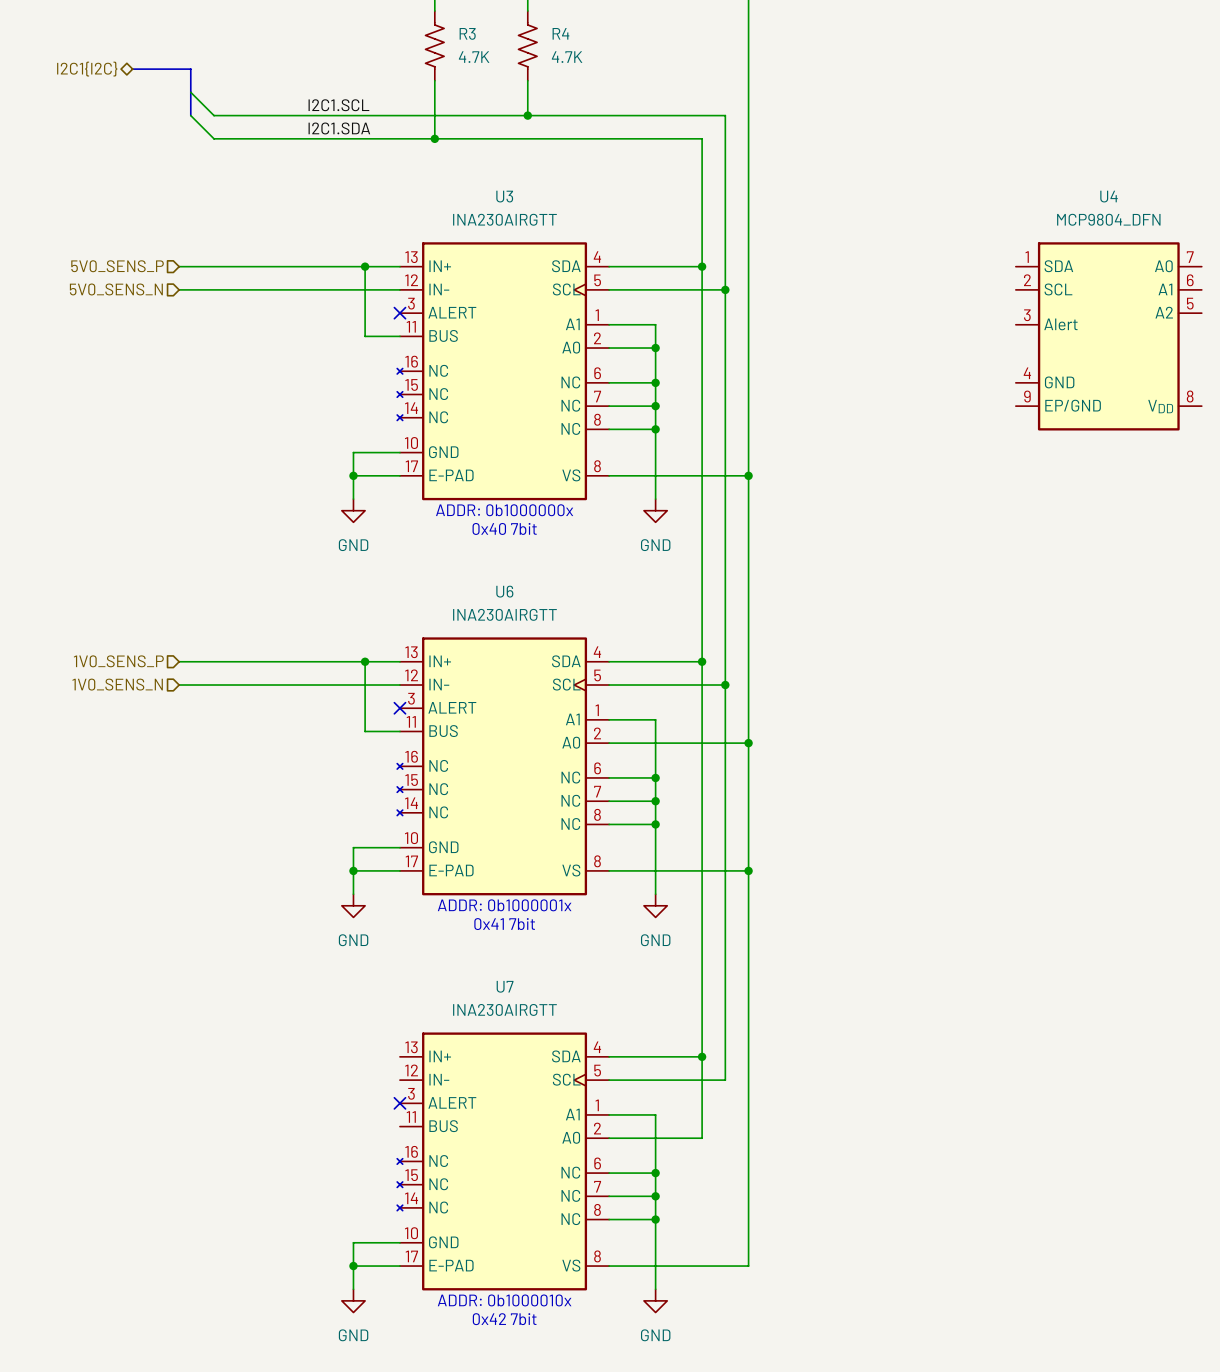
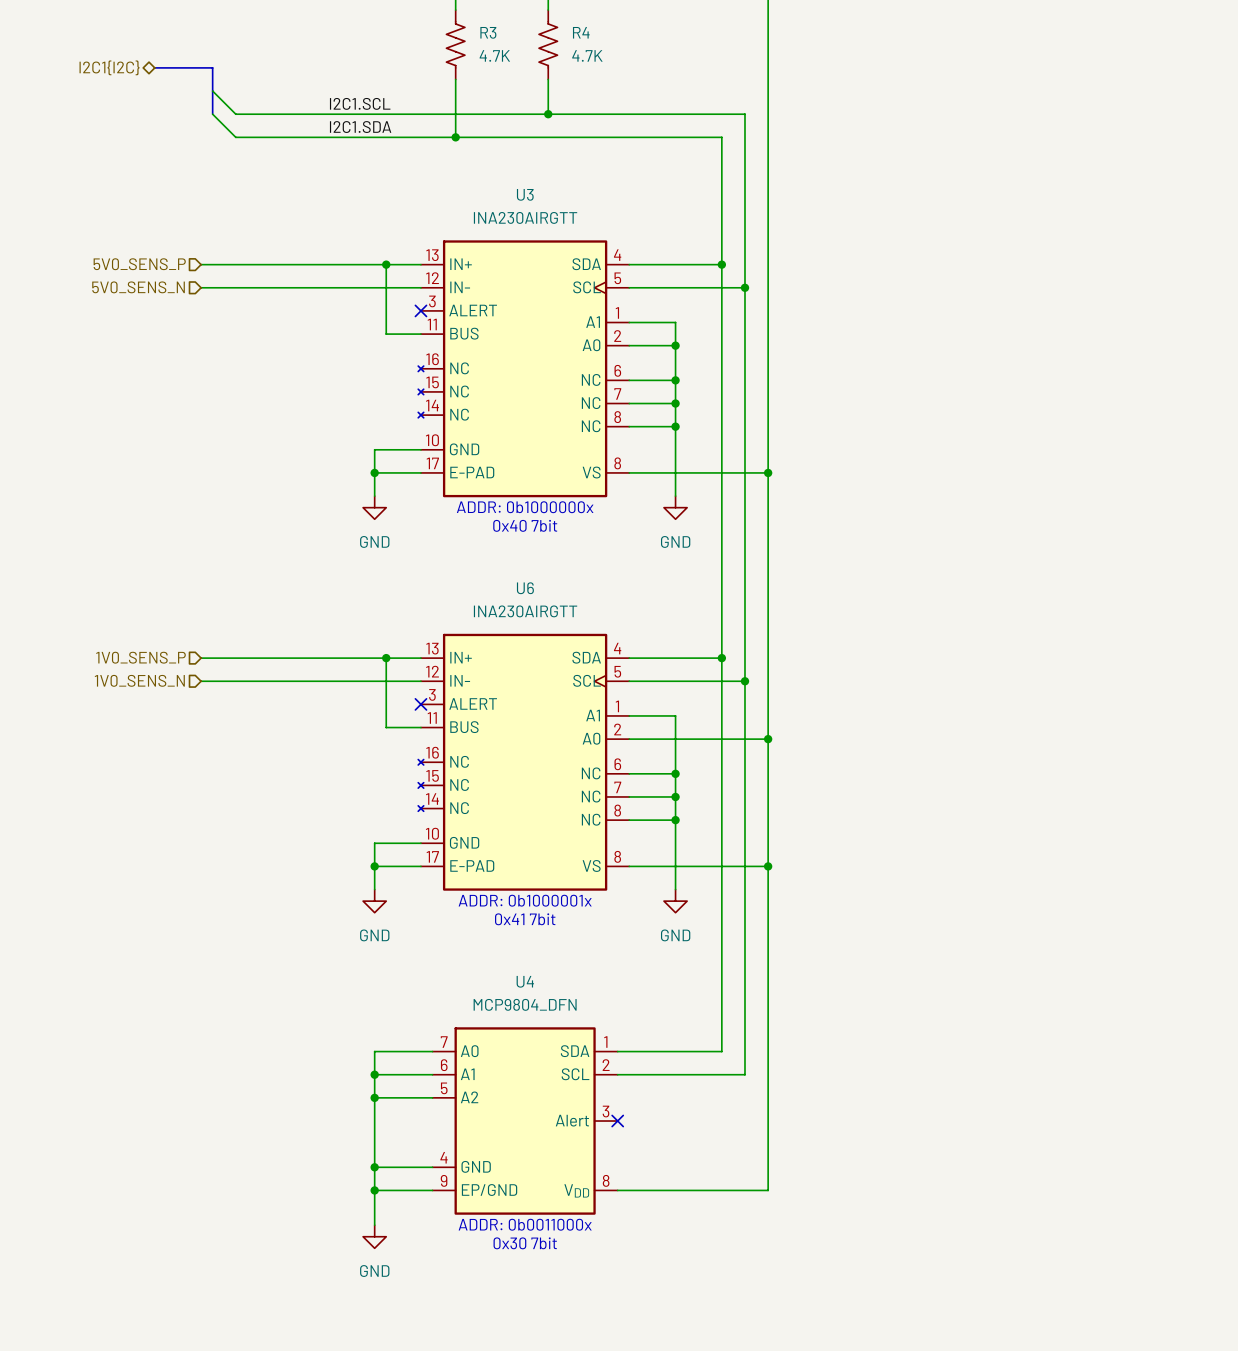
U4 symbol: [1015, 242, 1202, 431] -> [432, 1027, 618, 1215]
wire: none -> (432, 1051) (374, 1051) (374, 1225)
wire: (702, 1056) (702, 1138) (609, 1138) -> none
junction: (702, 1056) -> none
wire: none -> (374, 1074) (432, 1074)
junction: none -> (374, 1074)
wire: none -> (374, 1097) (432, 1097)
junction: none -> (374, 1097)
no-connect mark: (399, 1103) -> none
wire: (609, 1114) (655, 1114) (655, 1289) -> none
no-connect mark: none -> (617, 1121)
U7: INA230AIRGTT (503, 1161) -> none
wire: none -> (374, 1167) (432, 1167)
junction: none -> (374, 1167)
wire: (609, 1173) (655, 1173) -> none
junction: (655, 1173) -> none
wire: none -> (374, 1190) (432, 1190)
junction: none -> (374, 1190)
junction: (655, 1196) -> none
wire: (748, 1196) (748, 1266) (609, 1266) -> (768, 1190) (675, 1190)
wire: (609, 1219) (655, 1219) -> none
junction: (655, 1219) -> none
text: none -> ADDR: 0b0011000x (525, 1224)
wire: (399, 1242) (353, 1242) (353, 1289) -> none
text: none -> 0x30 7bit (525, 1243)
wire: (353, 1266) (399, 1266) -> none
junction: (353, 1266) -> none
power symbol position: GND (353, 1300) -> GND (374, 1236)
text: ADDR: 0b1000010x (504, 1300) -> none
power symbol: GND (655, 1300) -> none
text: 0x42 7bit (504, 1319) -> none

